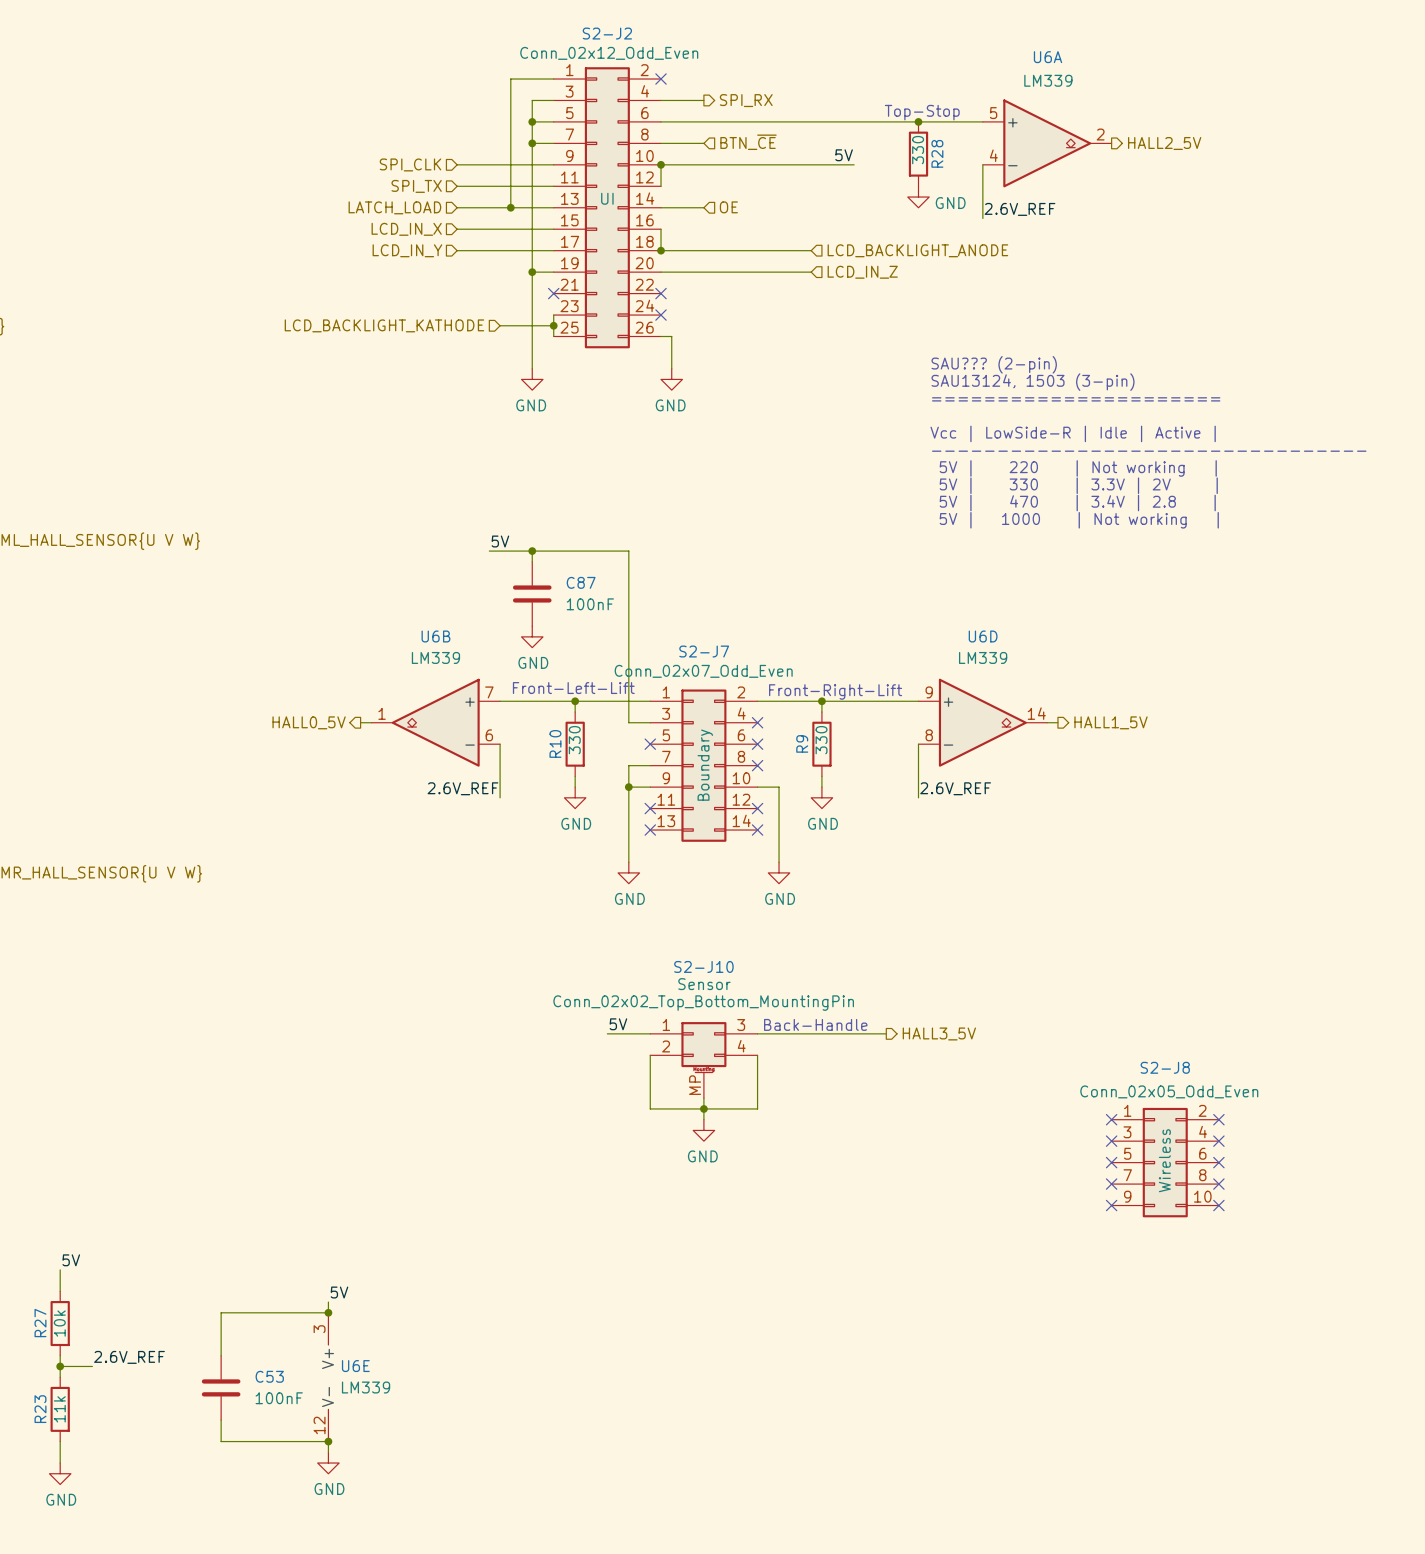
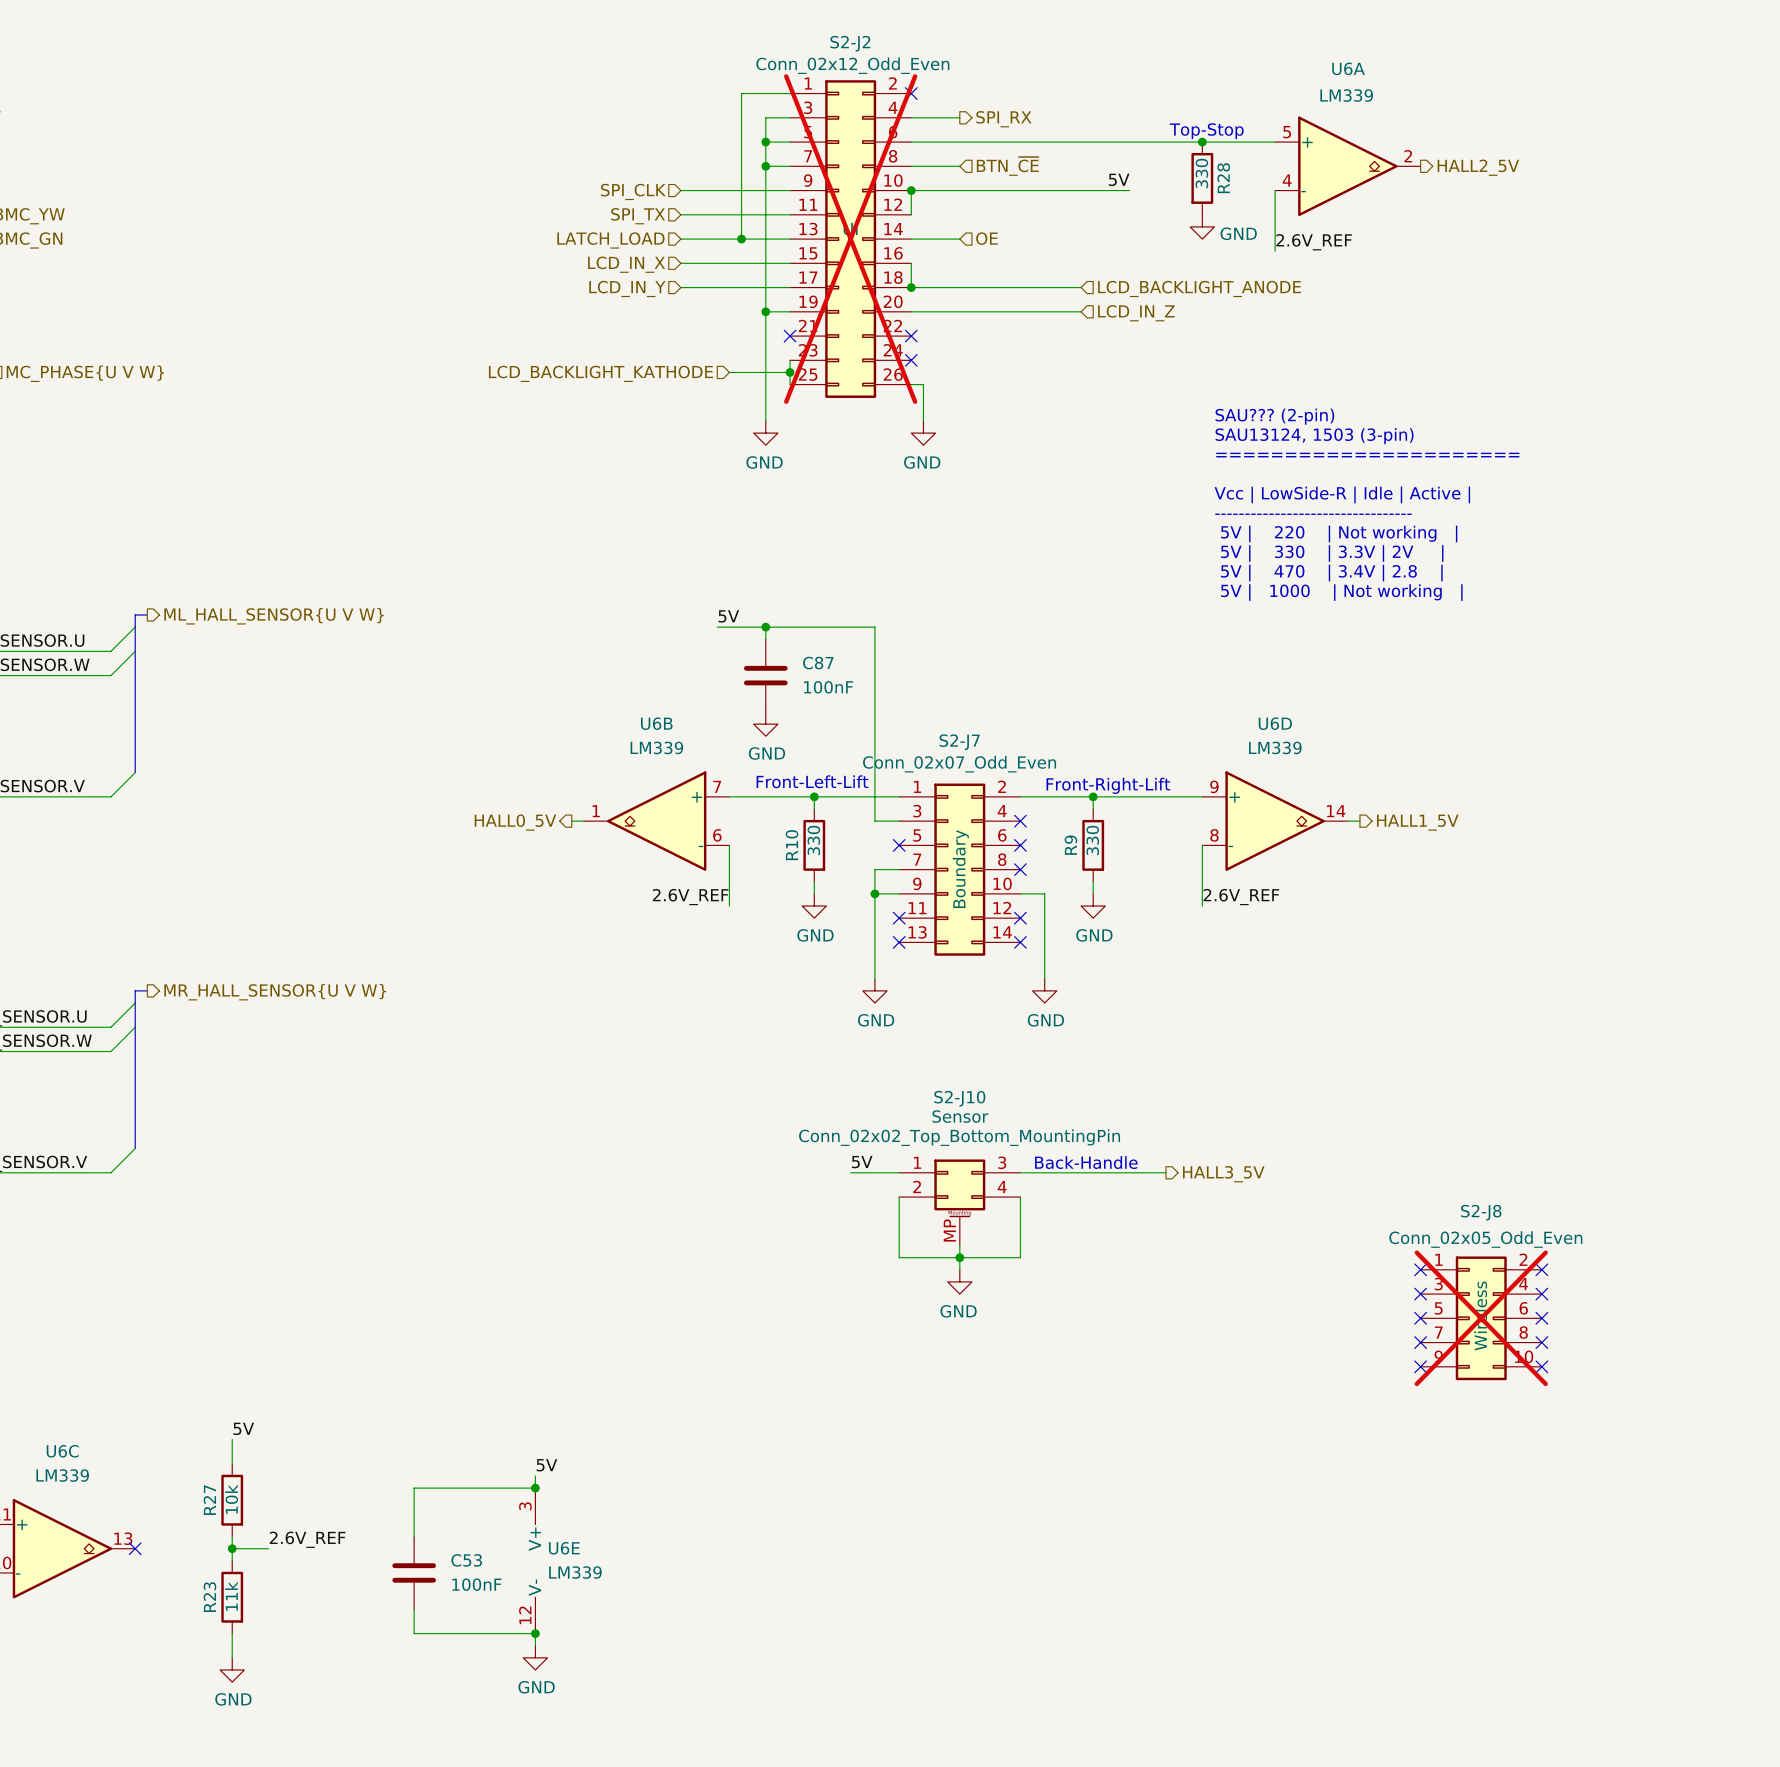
S2-J2 do-not-place cross: none -> (850, 239)
S2-J8 do-not-place cross: none -> (1481, 1318)

